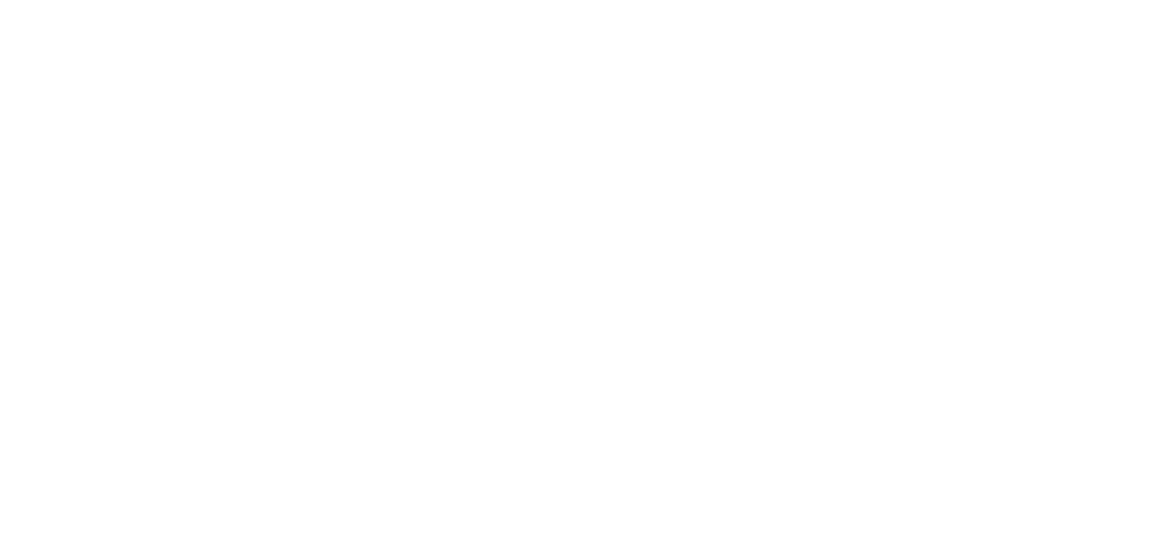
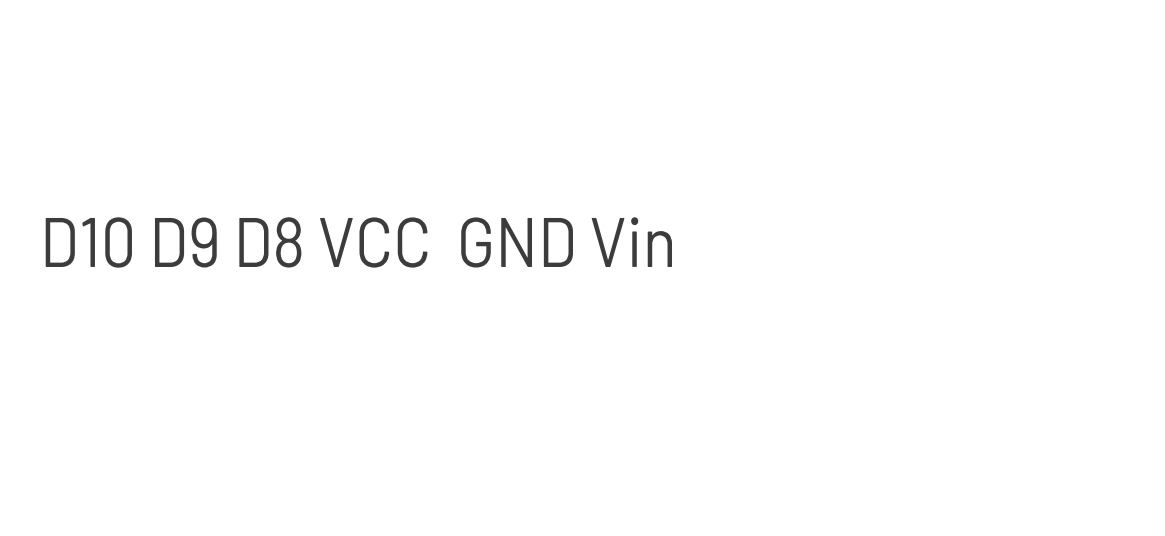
text: none -> D10 D9 D8 VCC GND Vin (358, 242)

